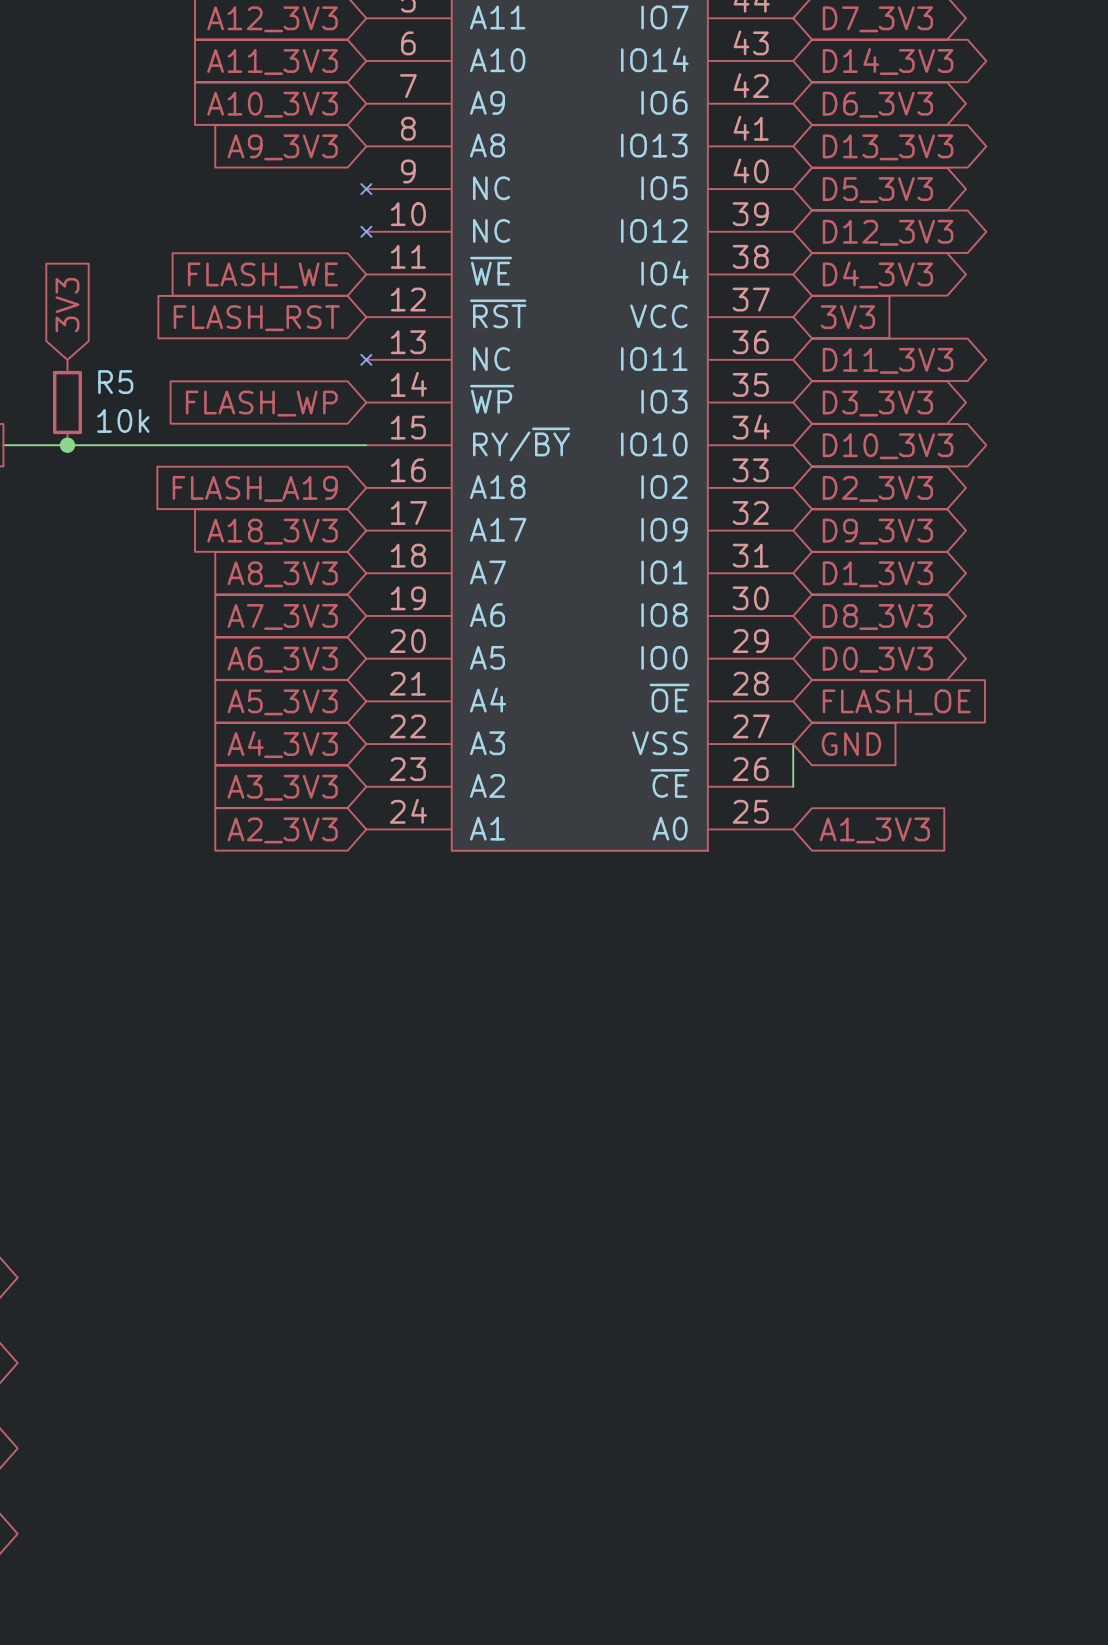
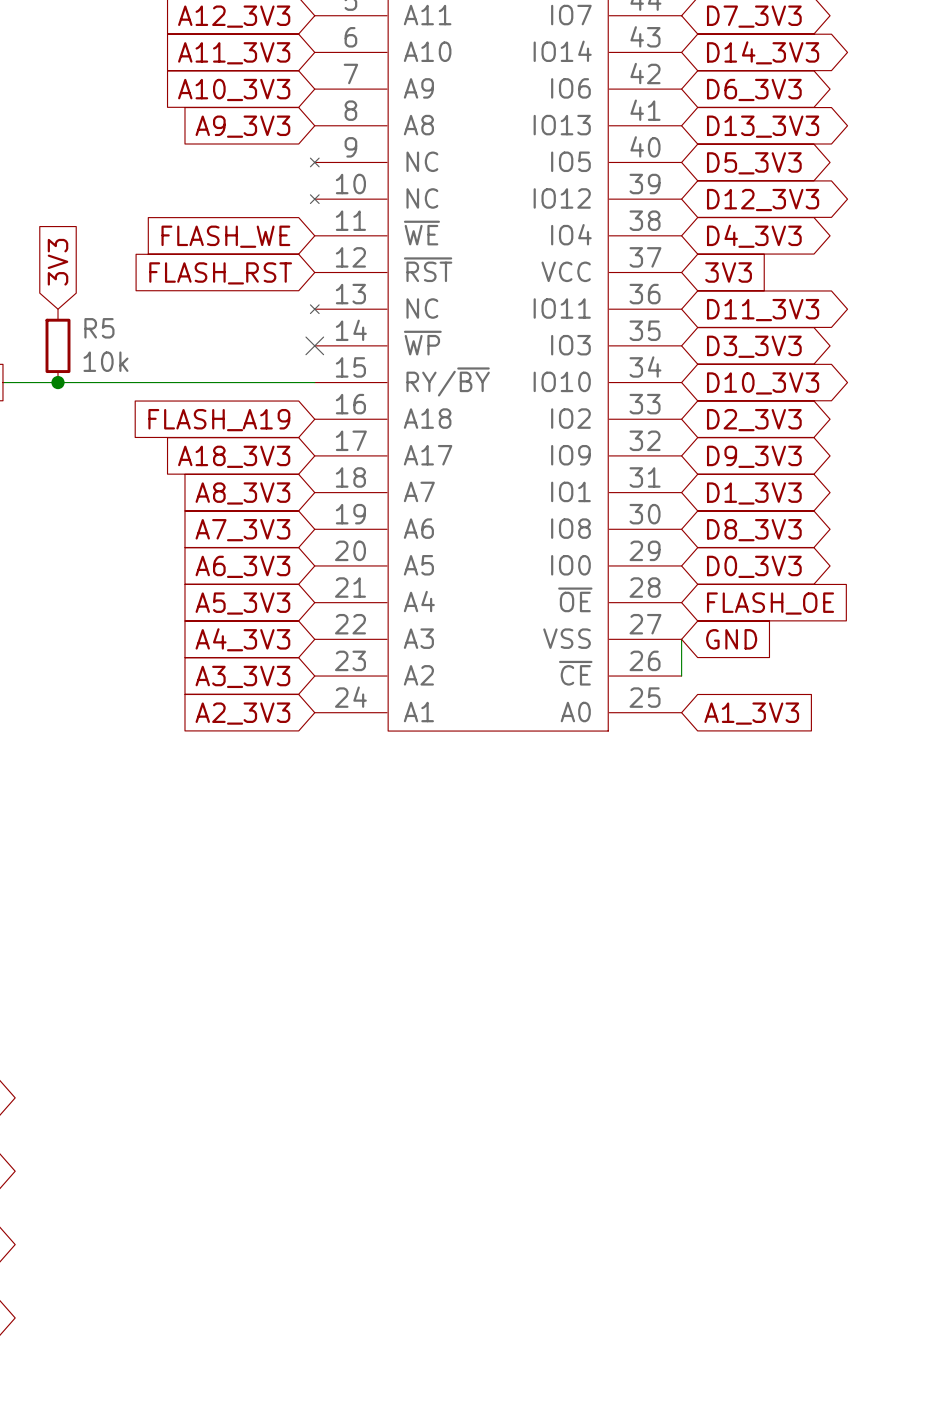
no-connect mark: none -> (314, 345)
global label: FLASH_WP (261, 403) -> none

